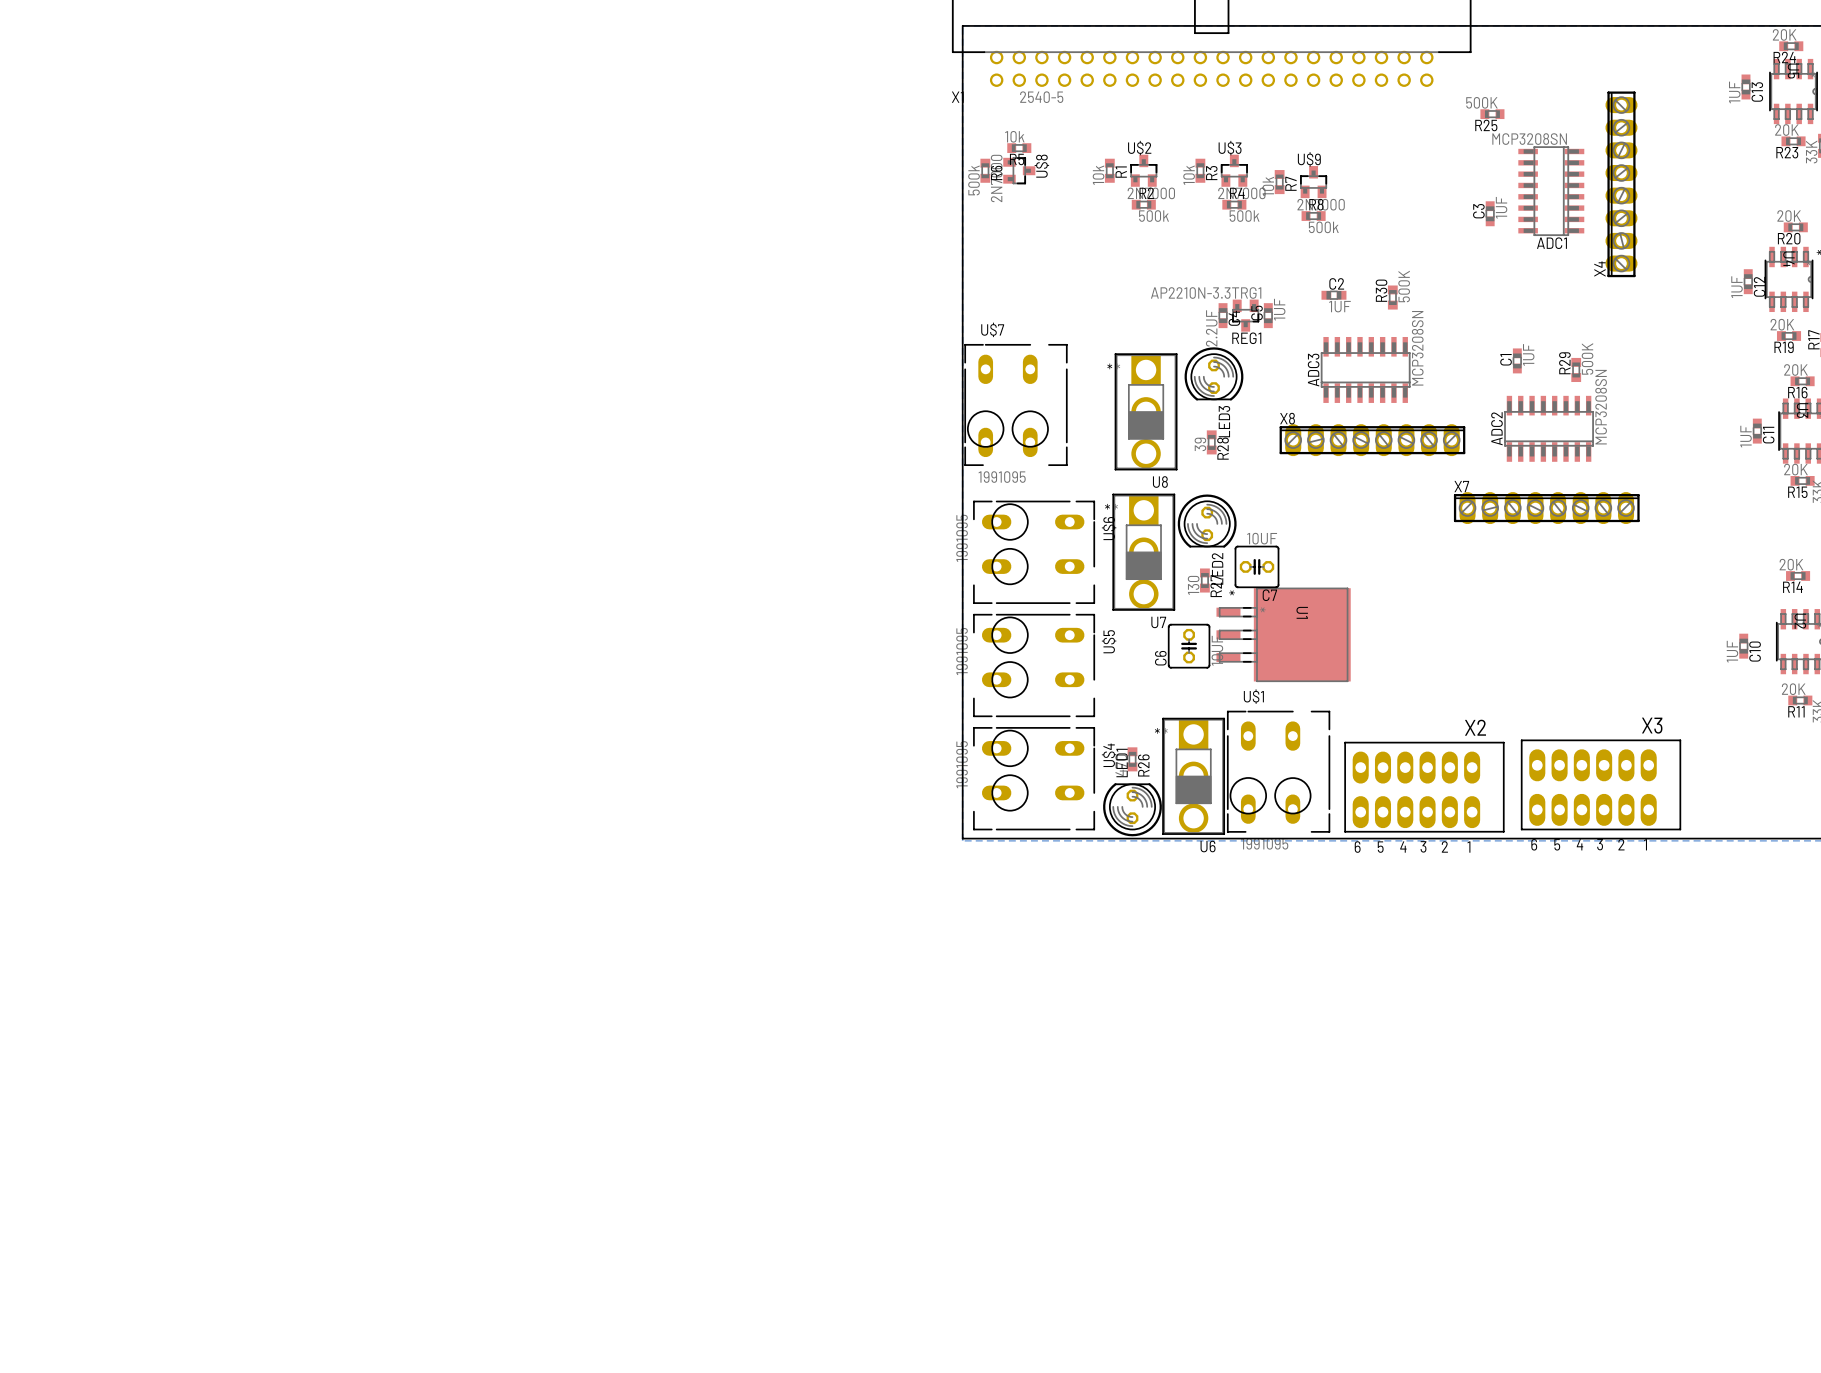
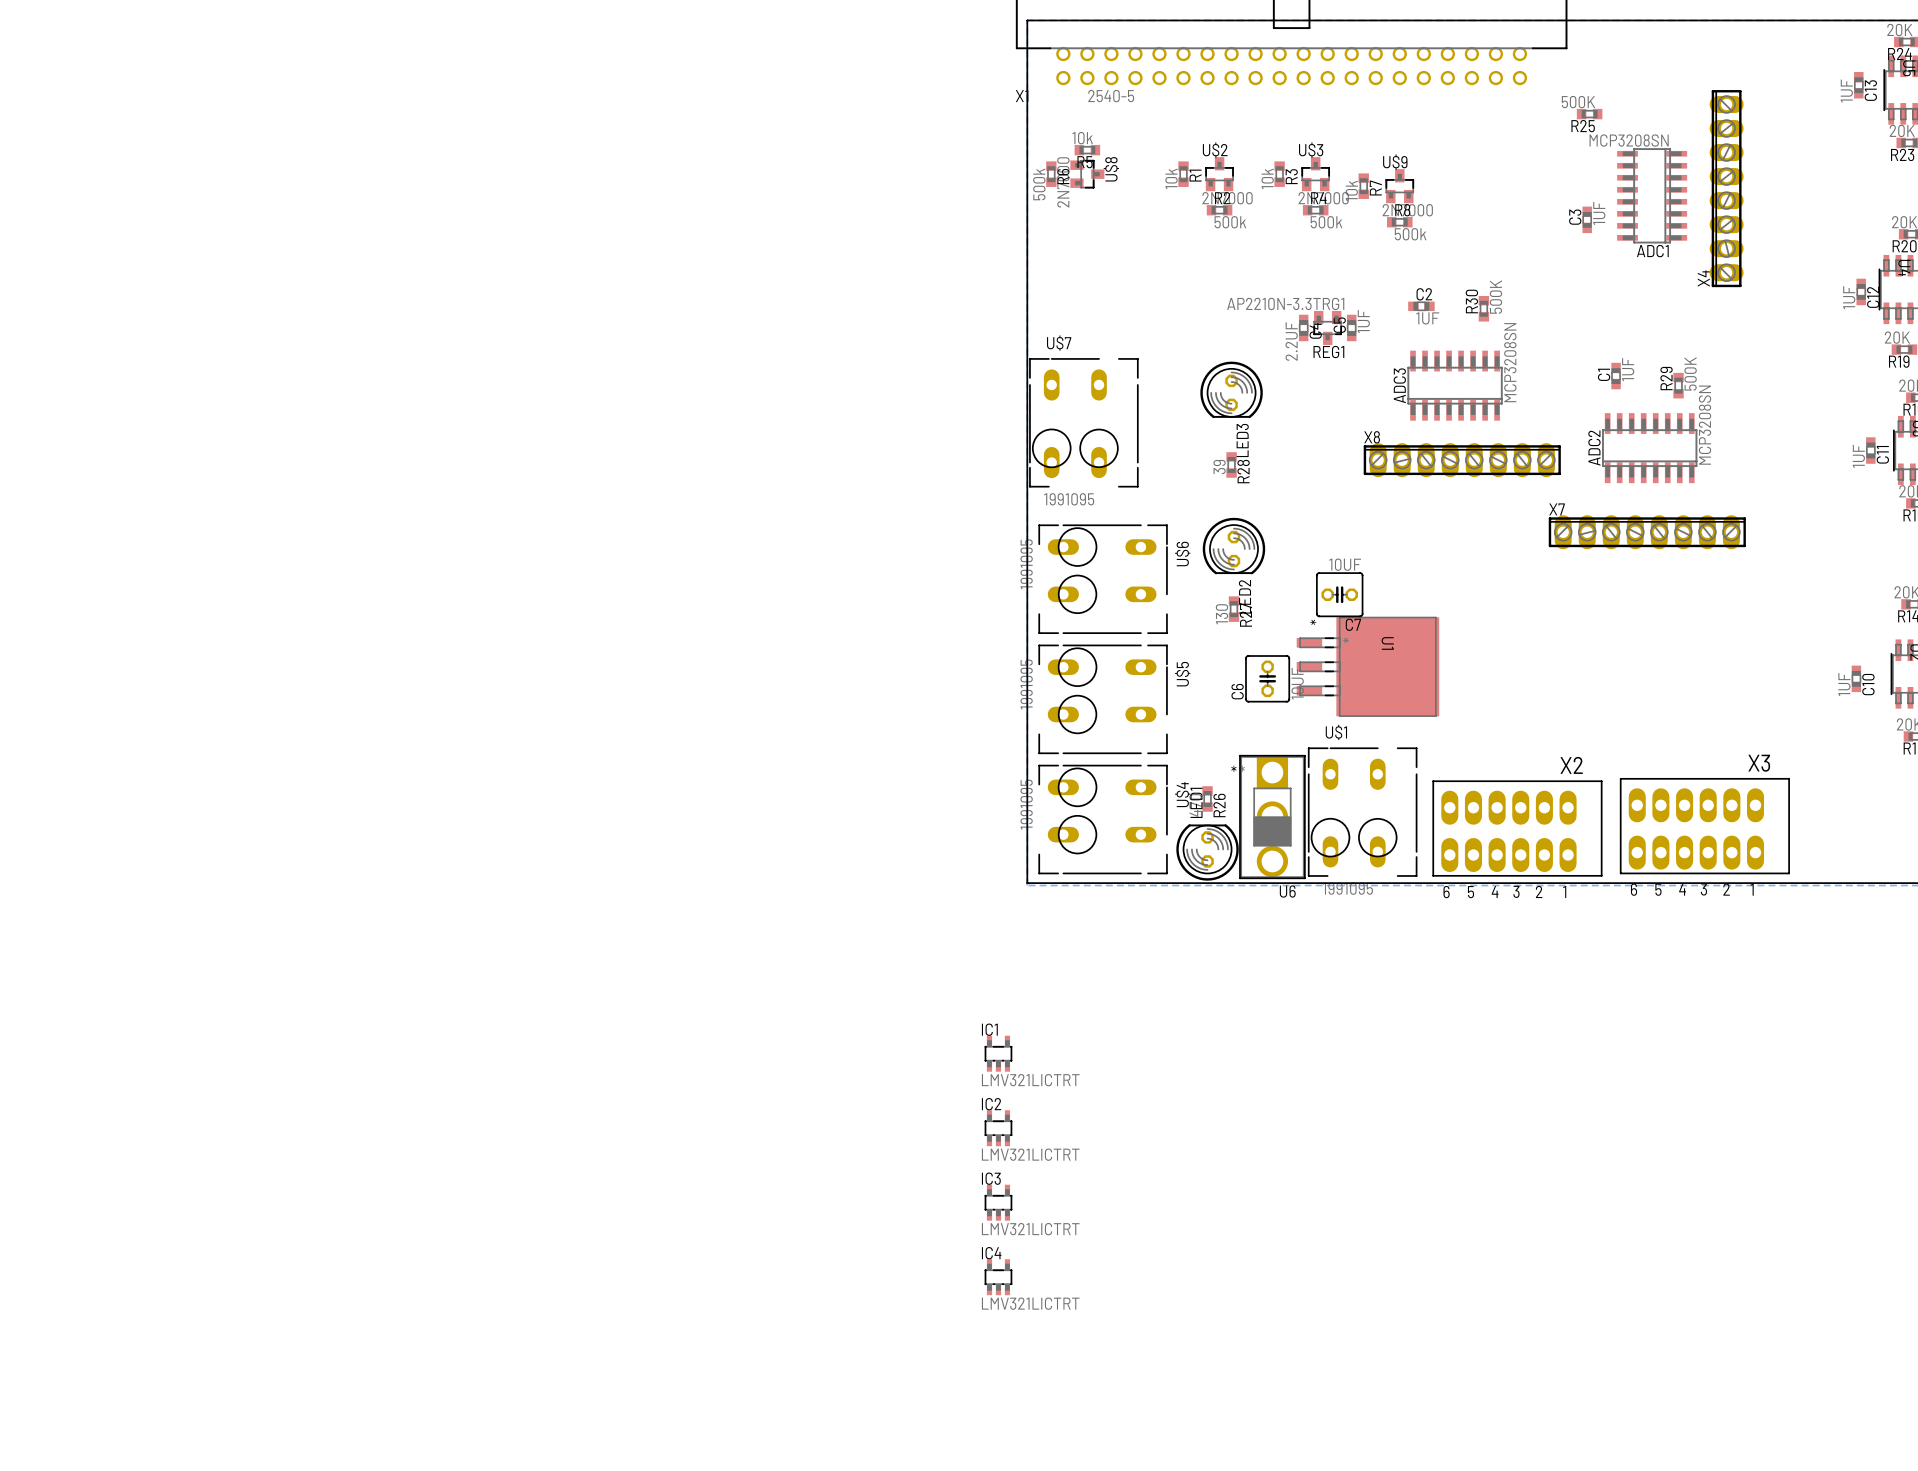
LED3 position: (1213, 373) -> (1231, 389)
U8: (1146, 411) -> none
R28 position: (1211, 442) -> (1231, 464)
LED2 position: (1207, 521) -> (1233, 546)
U7: (1143, 552) -> none
R27 position: (1204, 580) -> (1233, 609)
IC1: none -> LMV321LICTRT (998, 1053)
IC2: none -> LMV321LICTRT (998, 1128)
IC3: none -> LMV321LICTRT (998, 1202)
IC4: none -> LMV321LICTRT (998, 1277)

